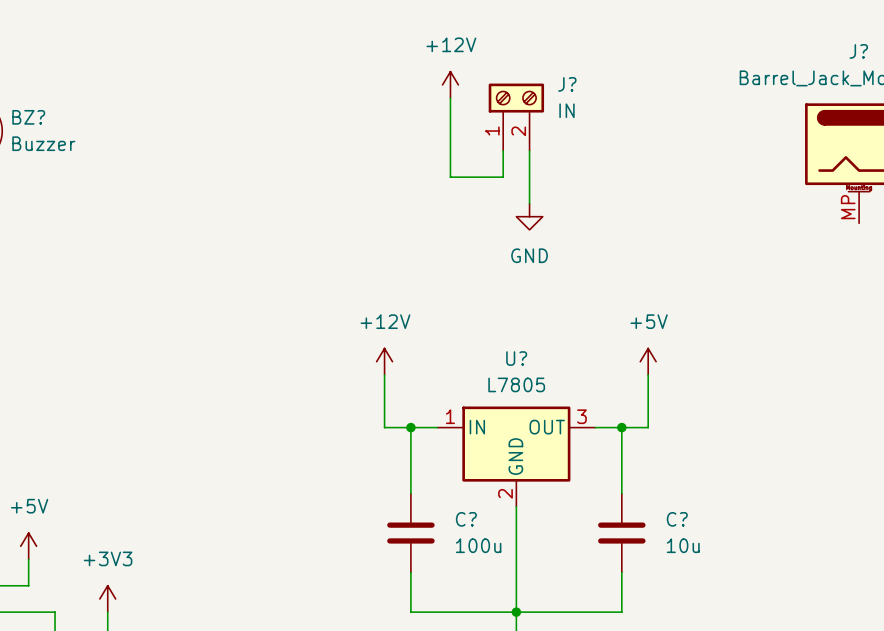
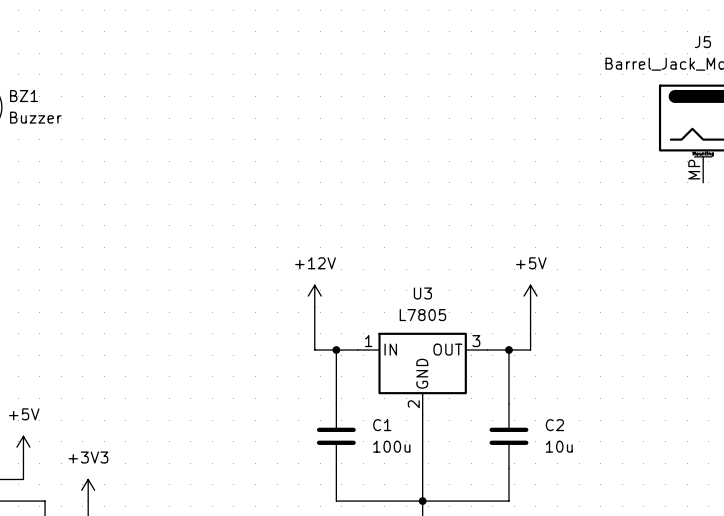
J? name: J? (858, 51) -> J5 (702, 42)
power symbol: +12V (450, 84) -> none
wire: (450, 98) (450, 177) (503, 177) (503, 150) -> none
BZ? name: BZ? (28, 117) -> BZ1 (24, 96)
J?: IN (516, 117) -> none
wire: (529, 150) (529, 203) -> none
power symbol: GND (529, 216) -> none
U? name: U? (516, 358) -> U3 (422, 293)
C? name: C? (466, 519) -> C1 (382, 425)
C? name: C? (677, 519) -> C2 (554, 425)

